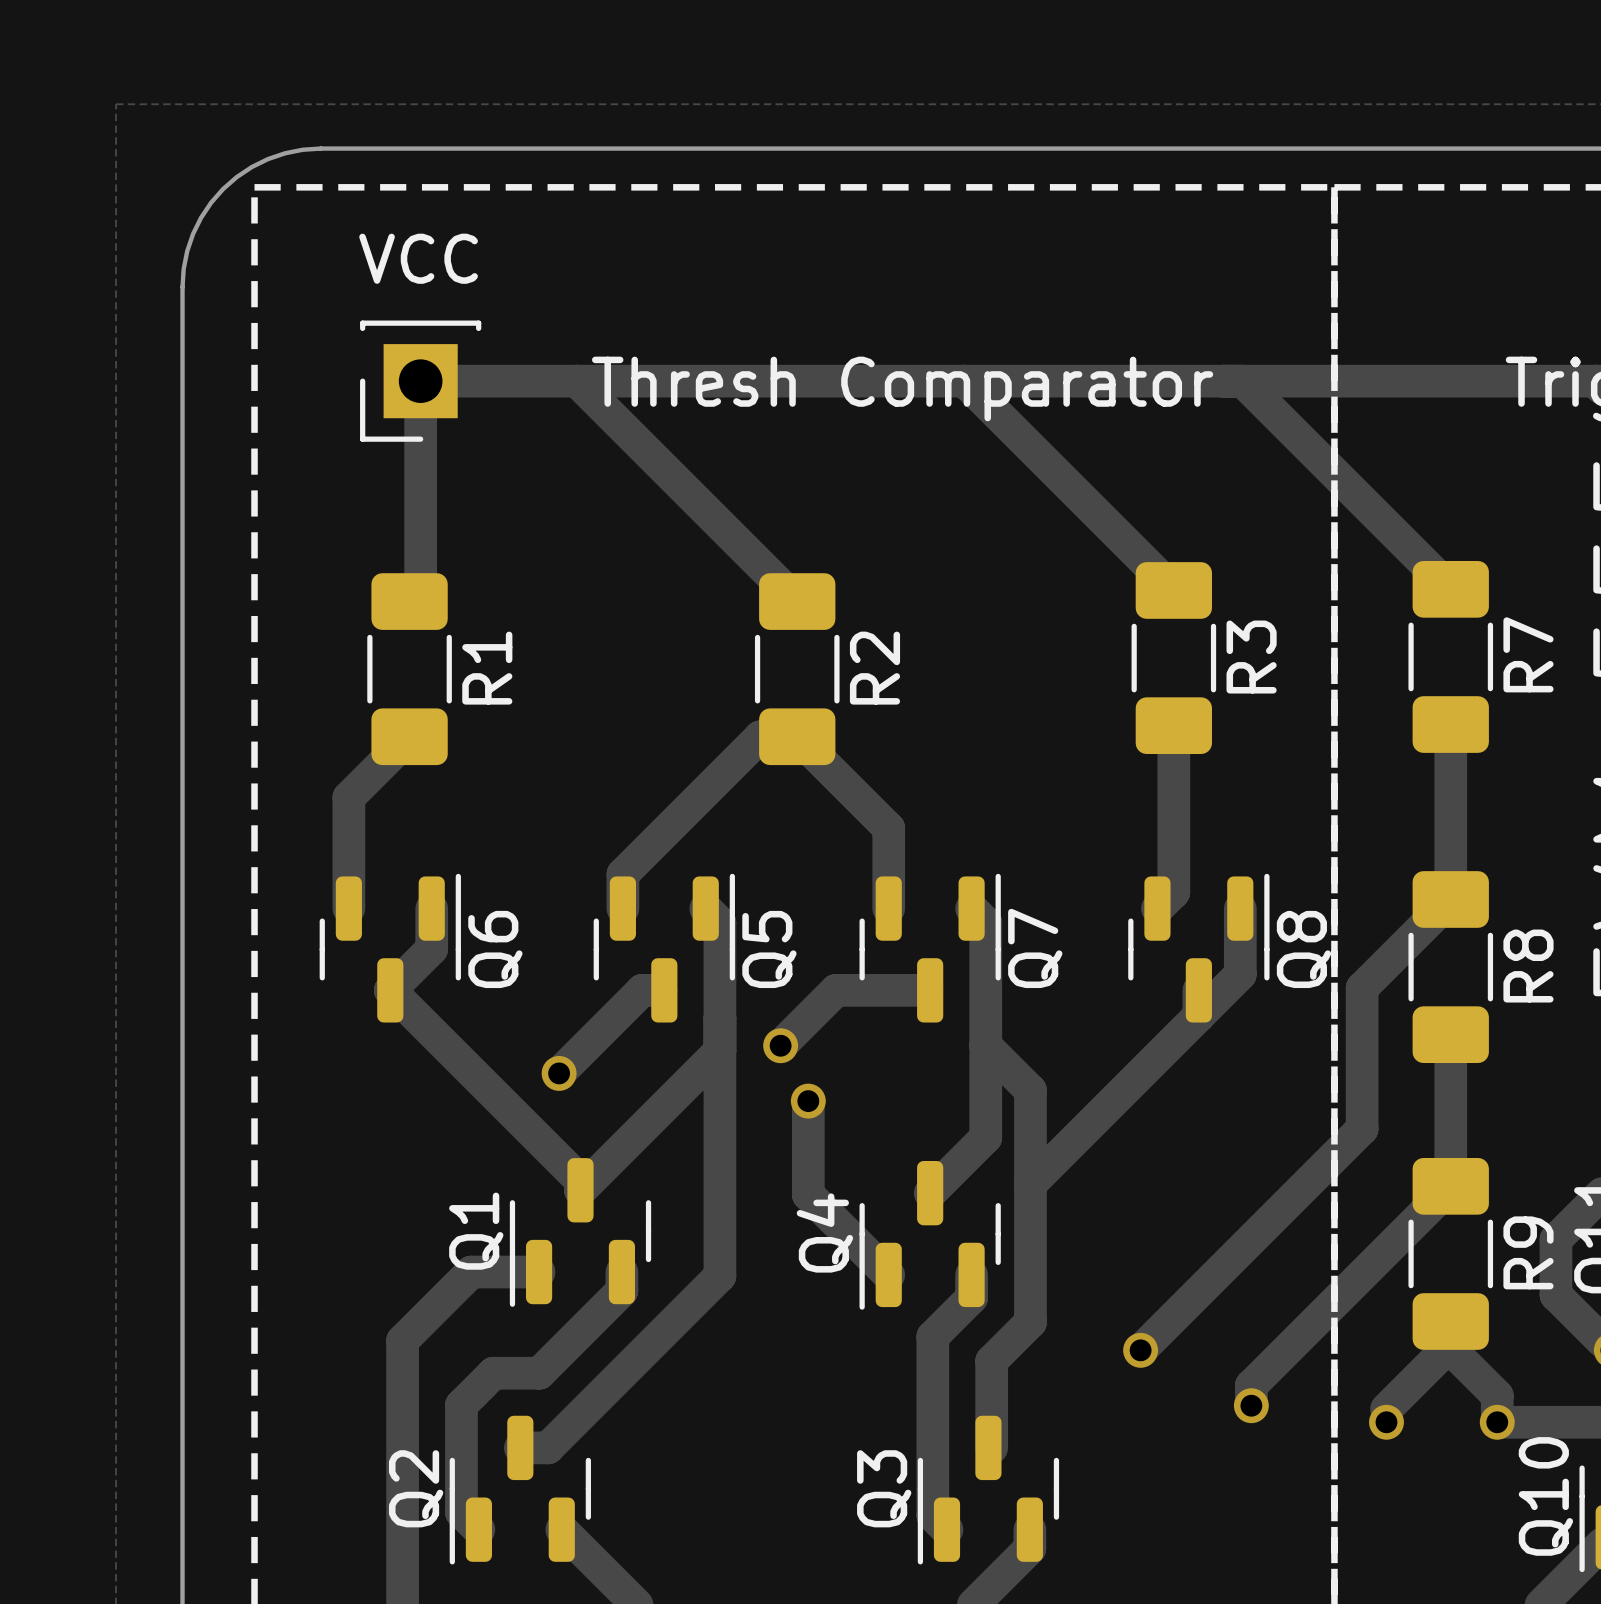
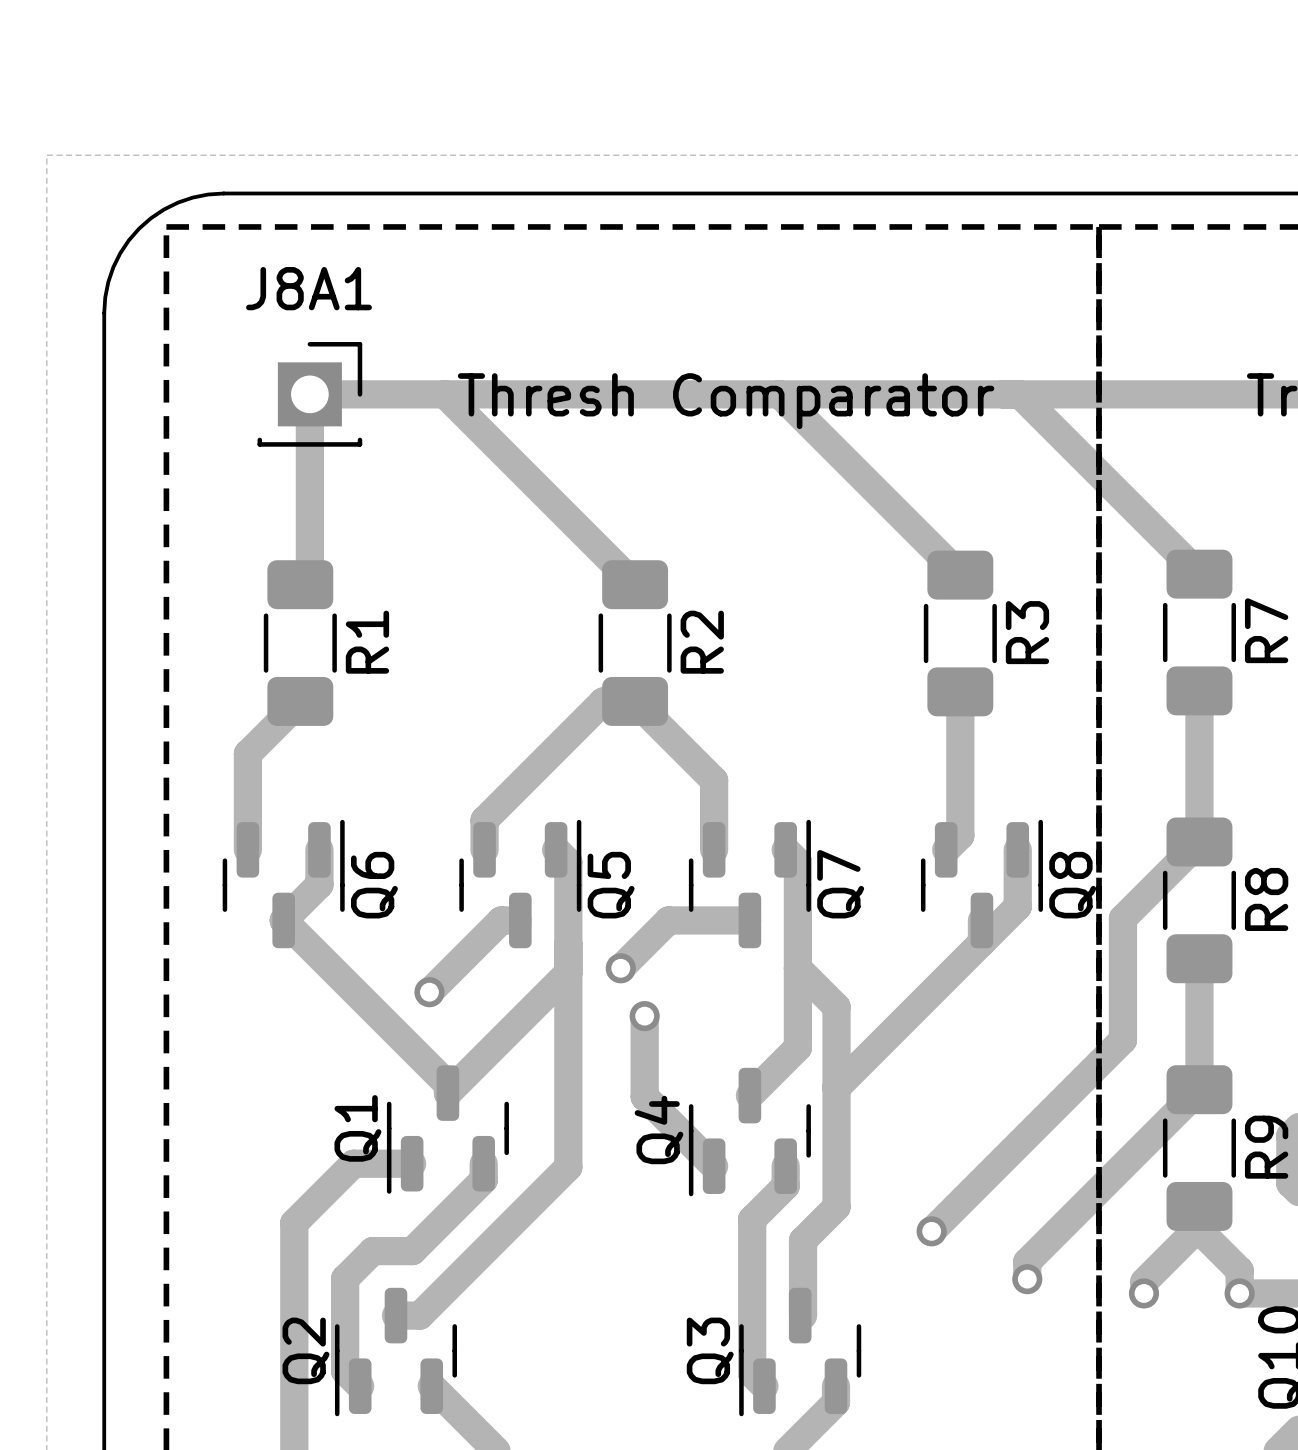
part: VCC (420, 381) -> none
J8A1: none -> (309, 394)

